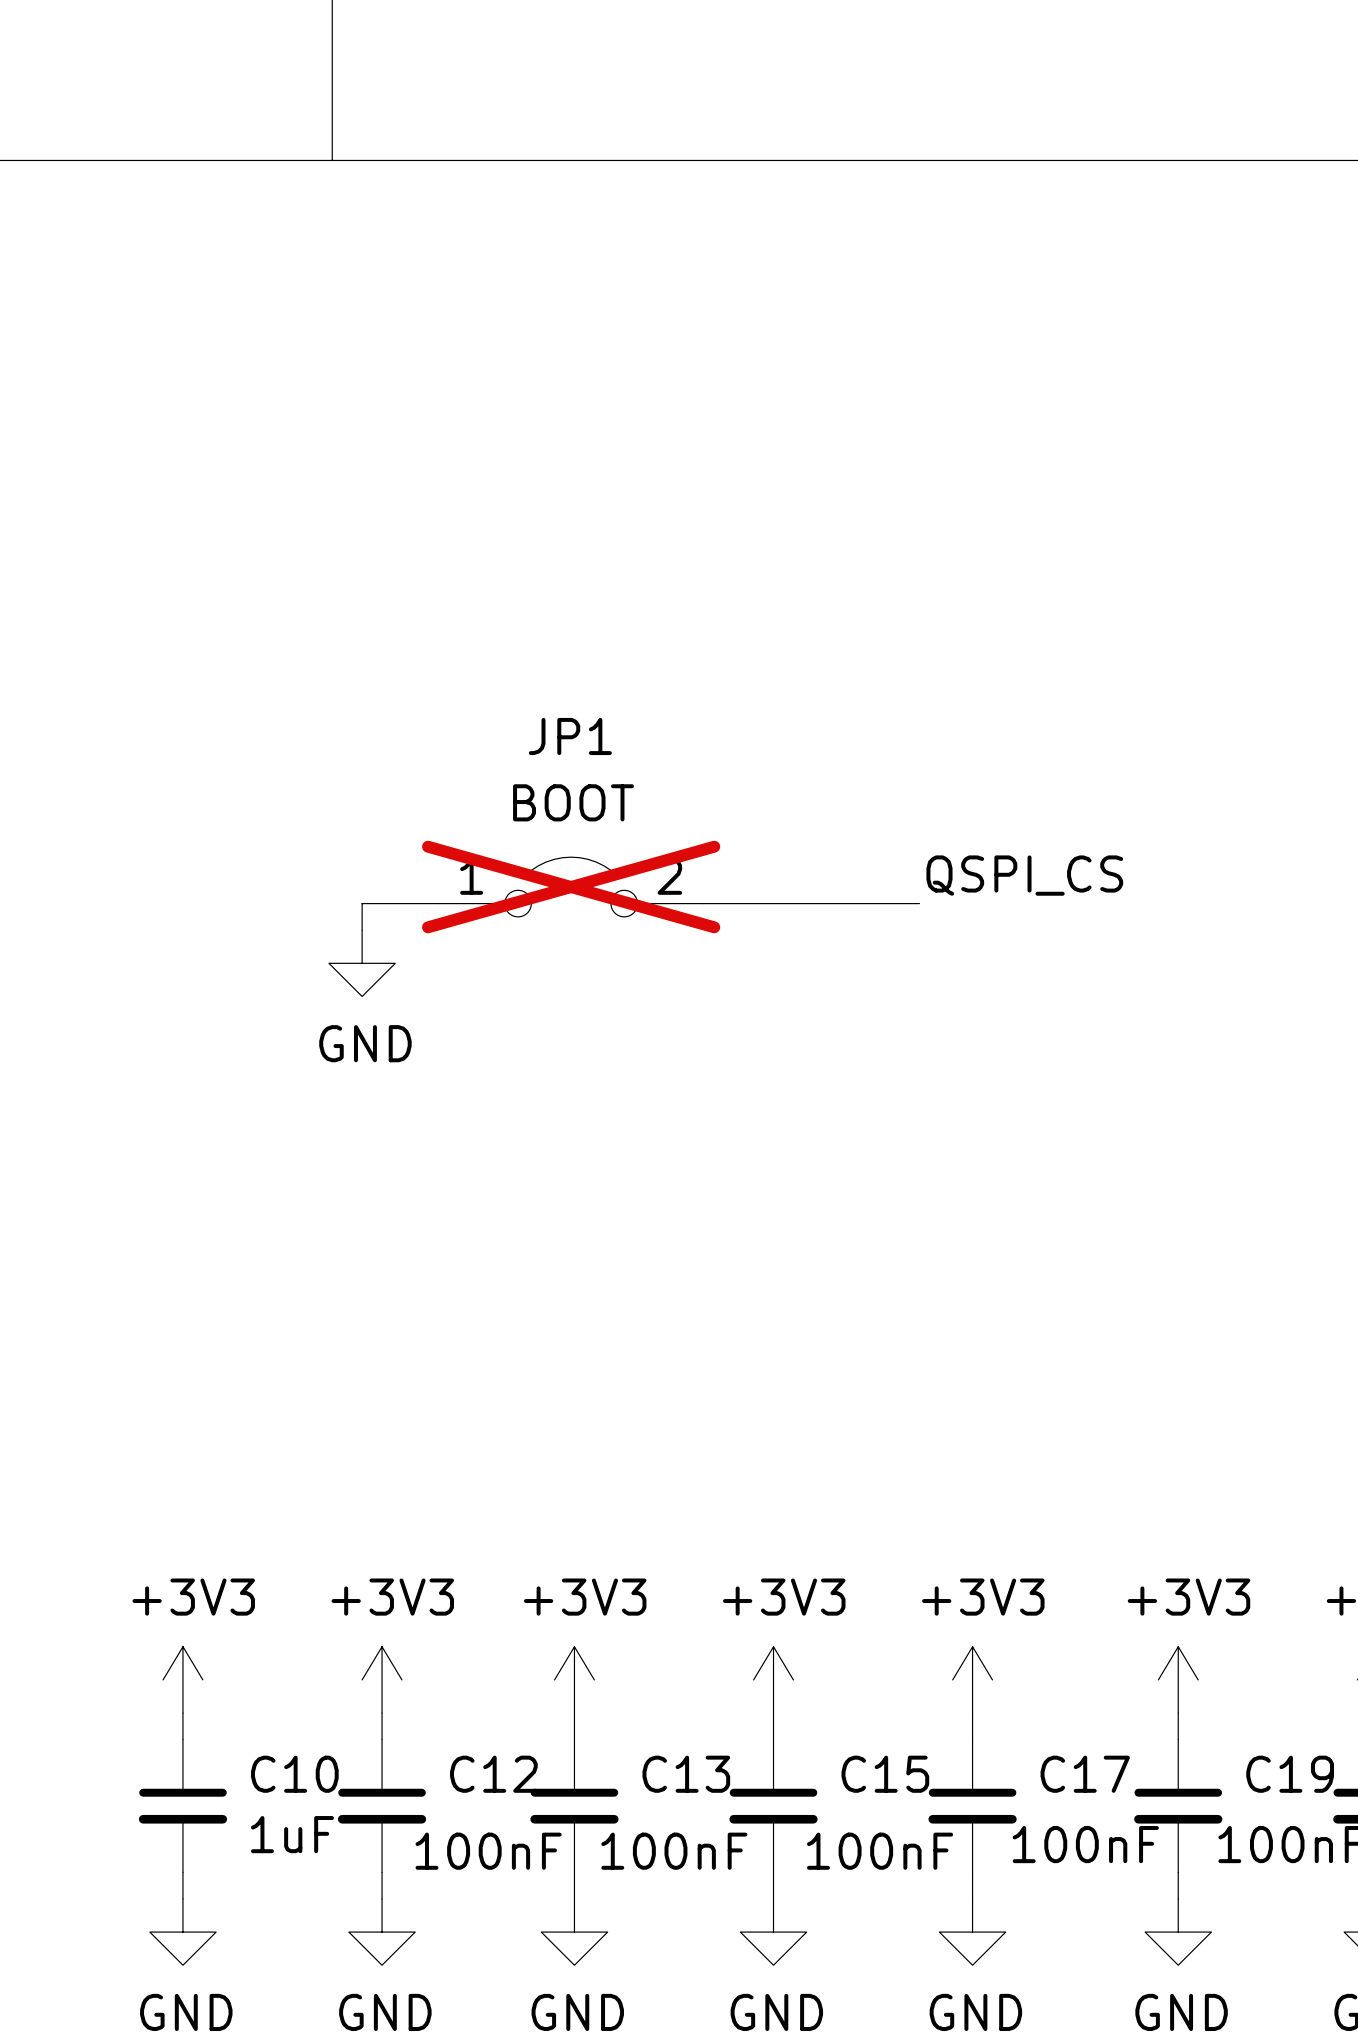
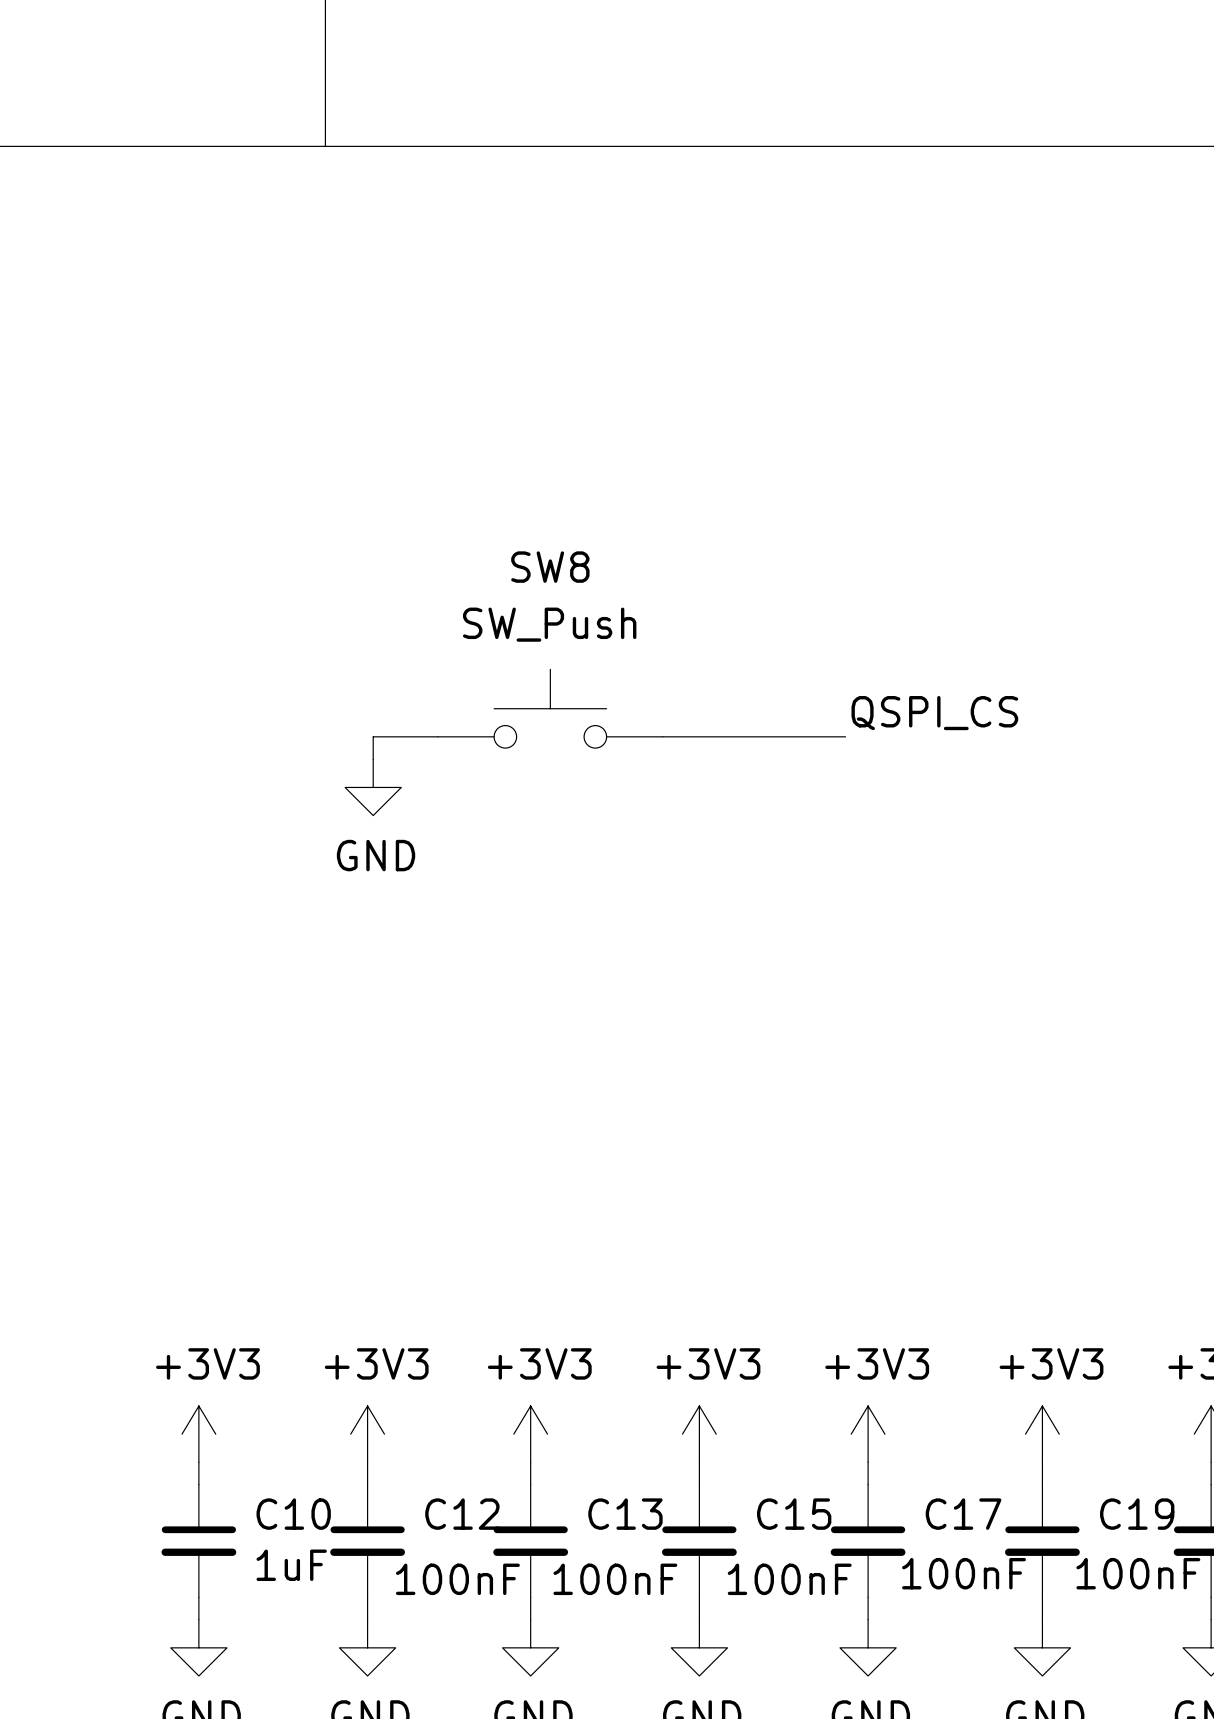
SW8: none -> SW_Push (550, 708)
label position: QSPI_CS (1024, 875) -> QSPI_CS (934, 713)
JP1: BOOT (571, 887) -> none
wire: (438, 903) (362, 903) (362, 930) -> (437, 736) (373, 736) (373, 759)
wire: (703, 903) (919, 903) -> (662, 736) (845, 736)
power symbol position: GND (362, 963) -> GND (373, 787)

